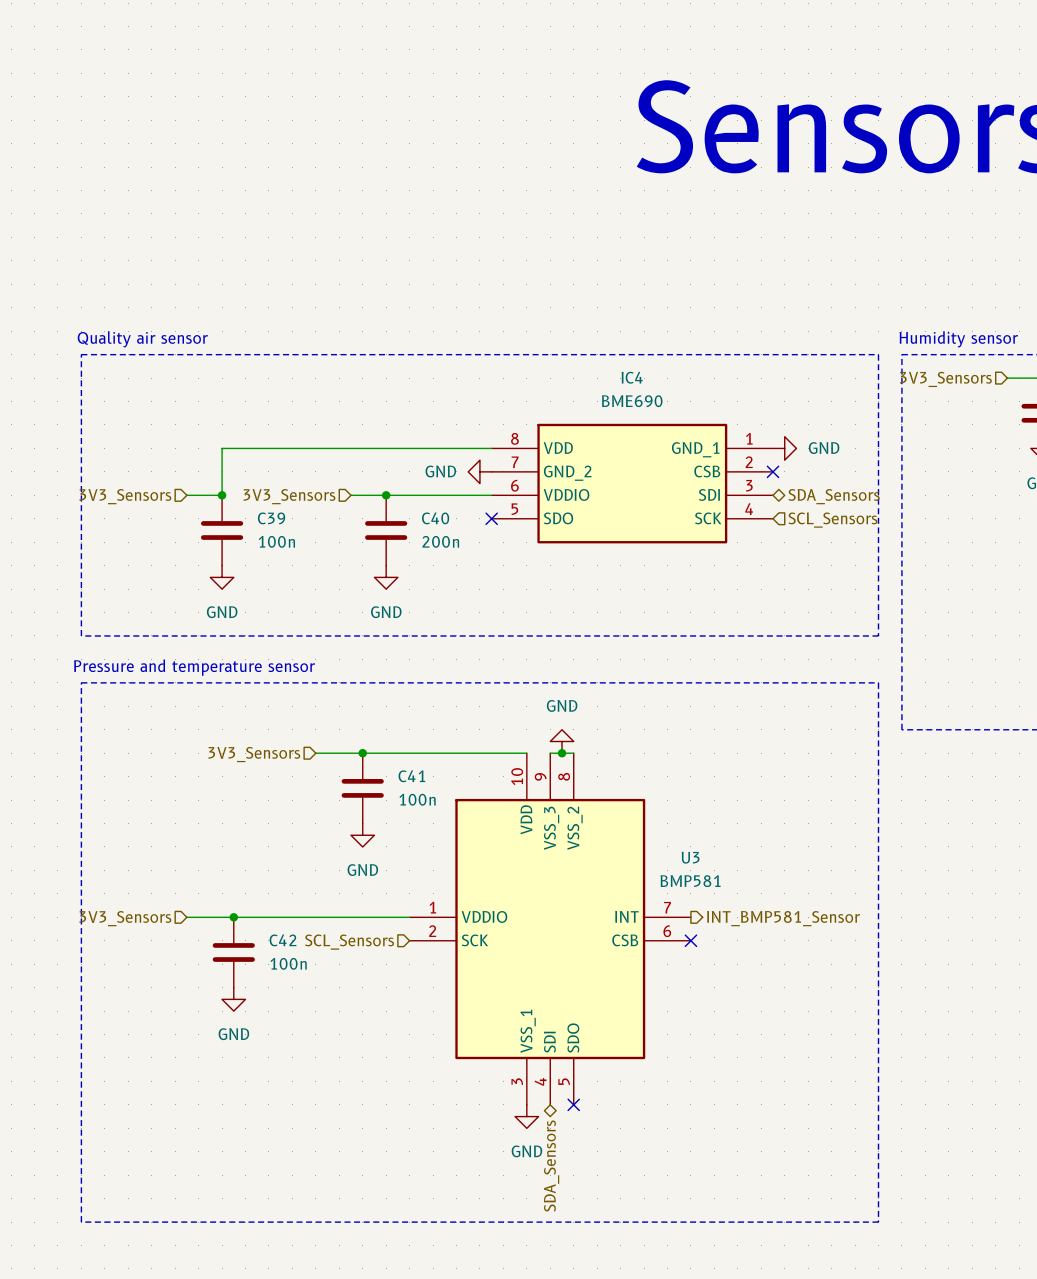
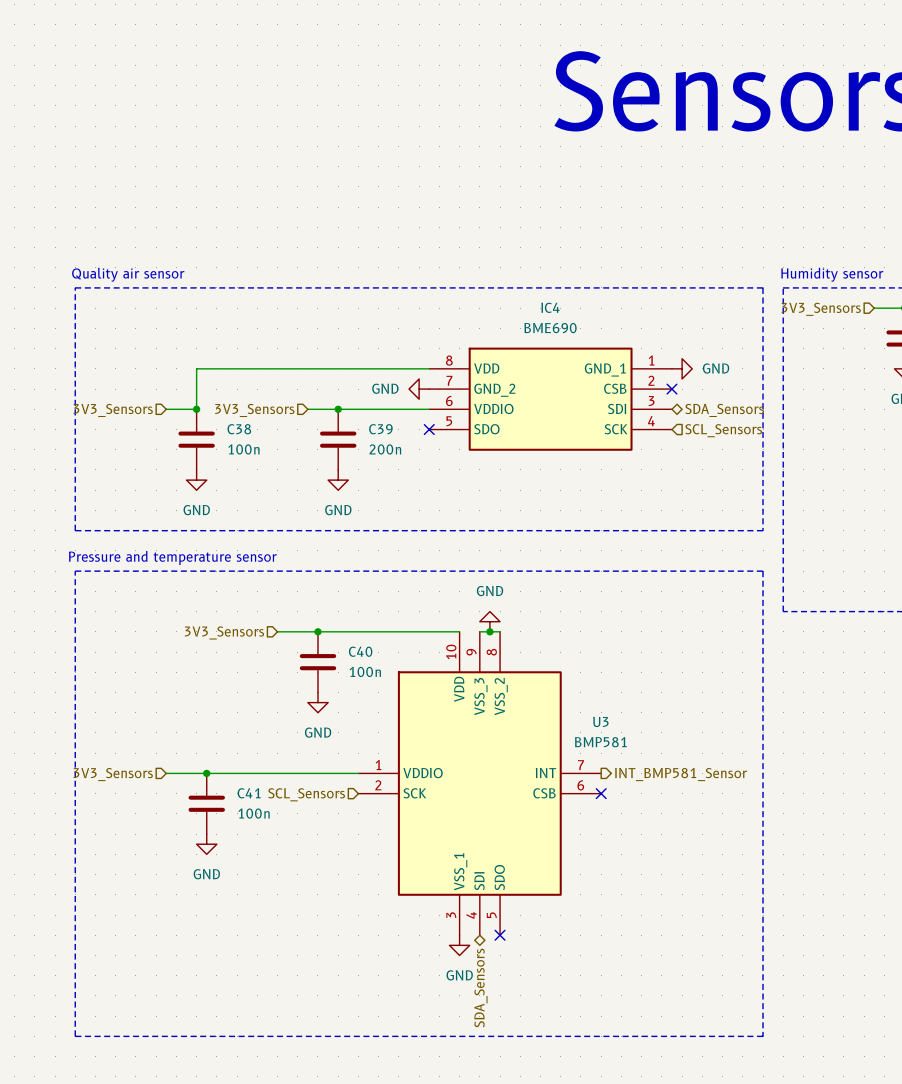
C39 name: C39 (271, 518) -> C38 (239, 429)
C40 name: C40 (435, 518) -> C39 (380, 429)
C41 name: C41 (411, 776) -> C40 (360, 651)
C42 name: C42 (283, 940) -> C41 (249, 793)

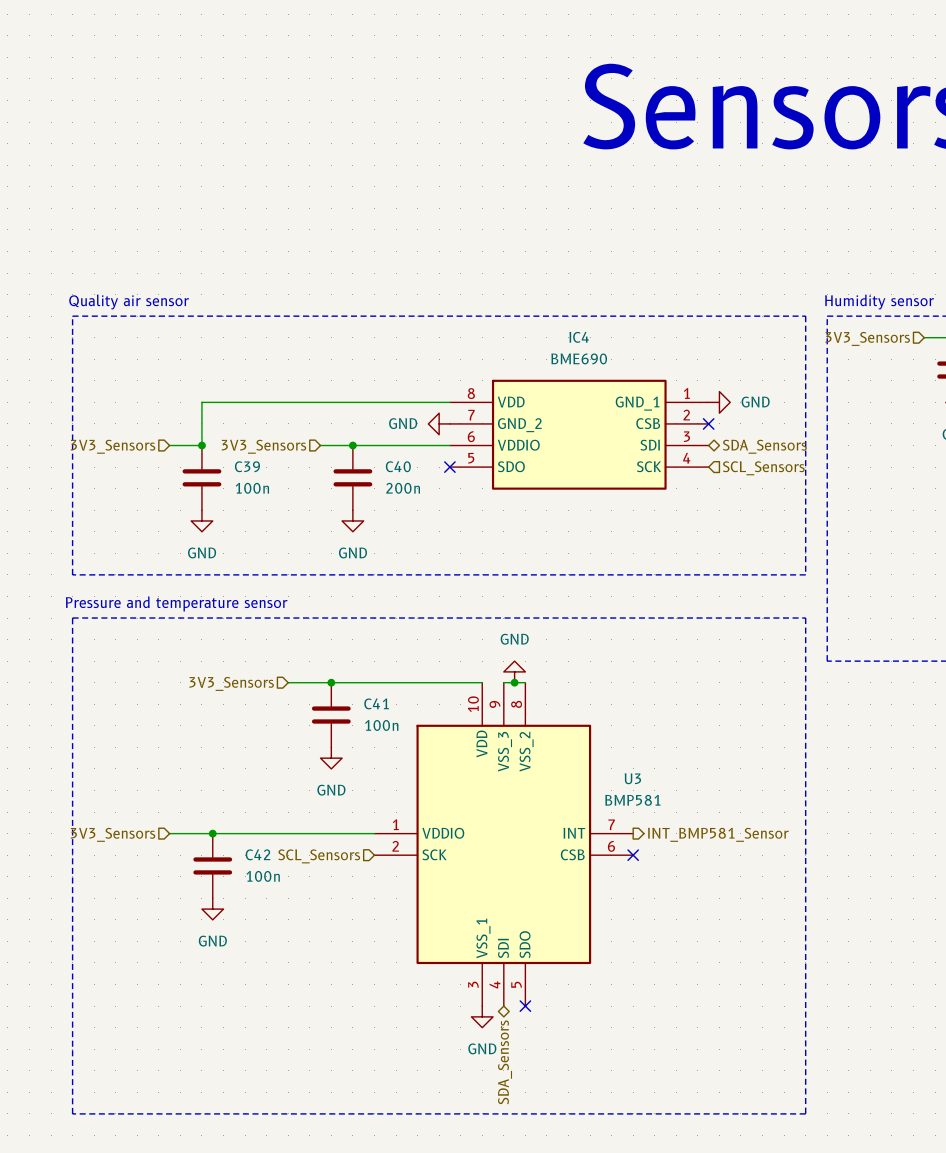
C38 name: C38 (239, 429) -> C39 (247, 466)
C39 name: C39 (380, 429) -> C40 (398, 466)
C40 name: C40 (360, 651) -> C41 (376, 703)
C41 name: C41 (249, 793) -> C42 (258, 854)

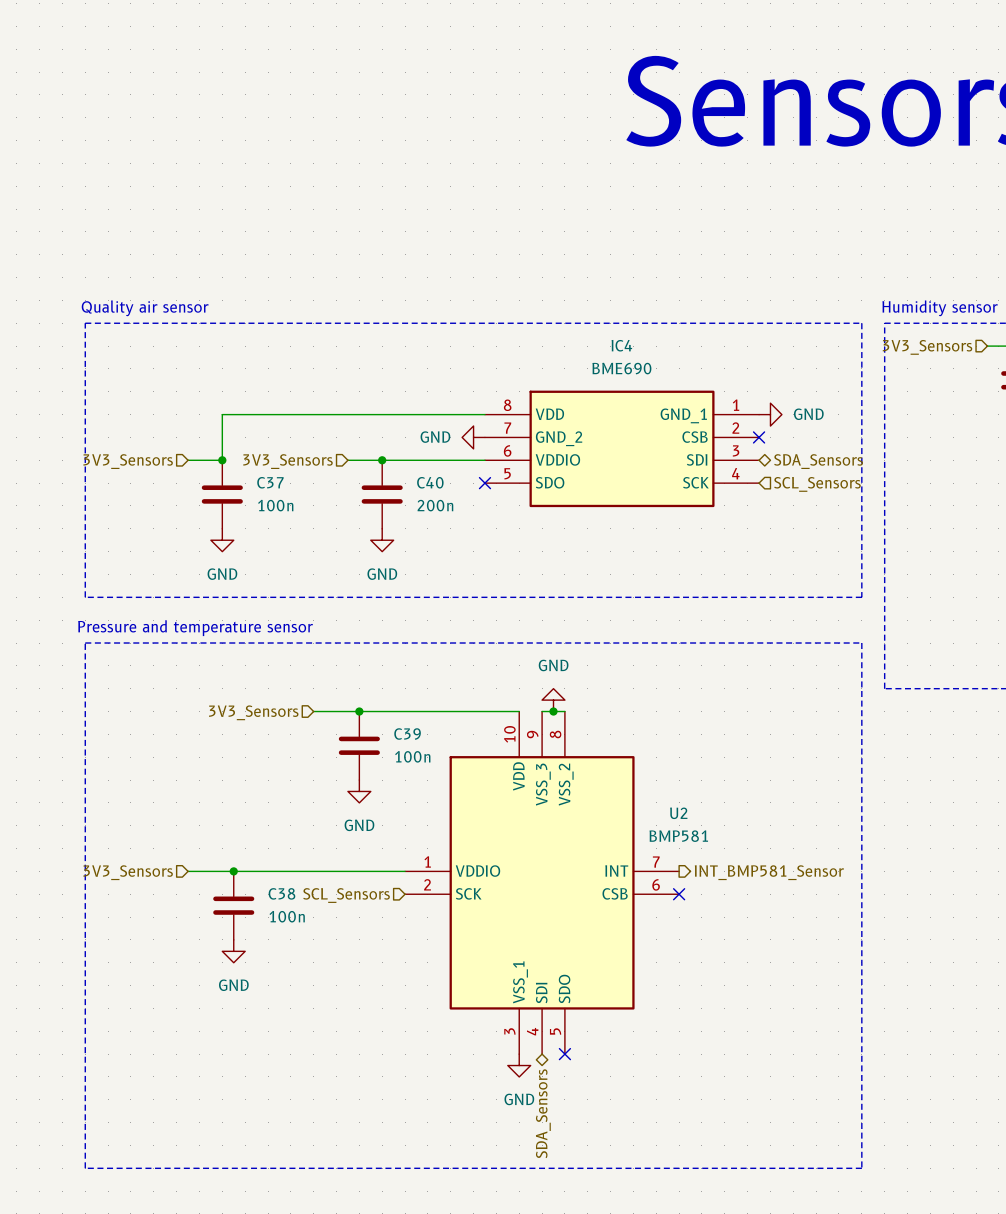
C39 name: C39 (247, 466) -> C37 (270, 482)
C41 name: C41 (376, 703) -> C39 (407, 734)
U3 name: U3 (632, 778) -> U2 (678, 813)
C42 name: C42 (258, 854) -> C38 (281, 893)

